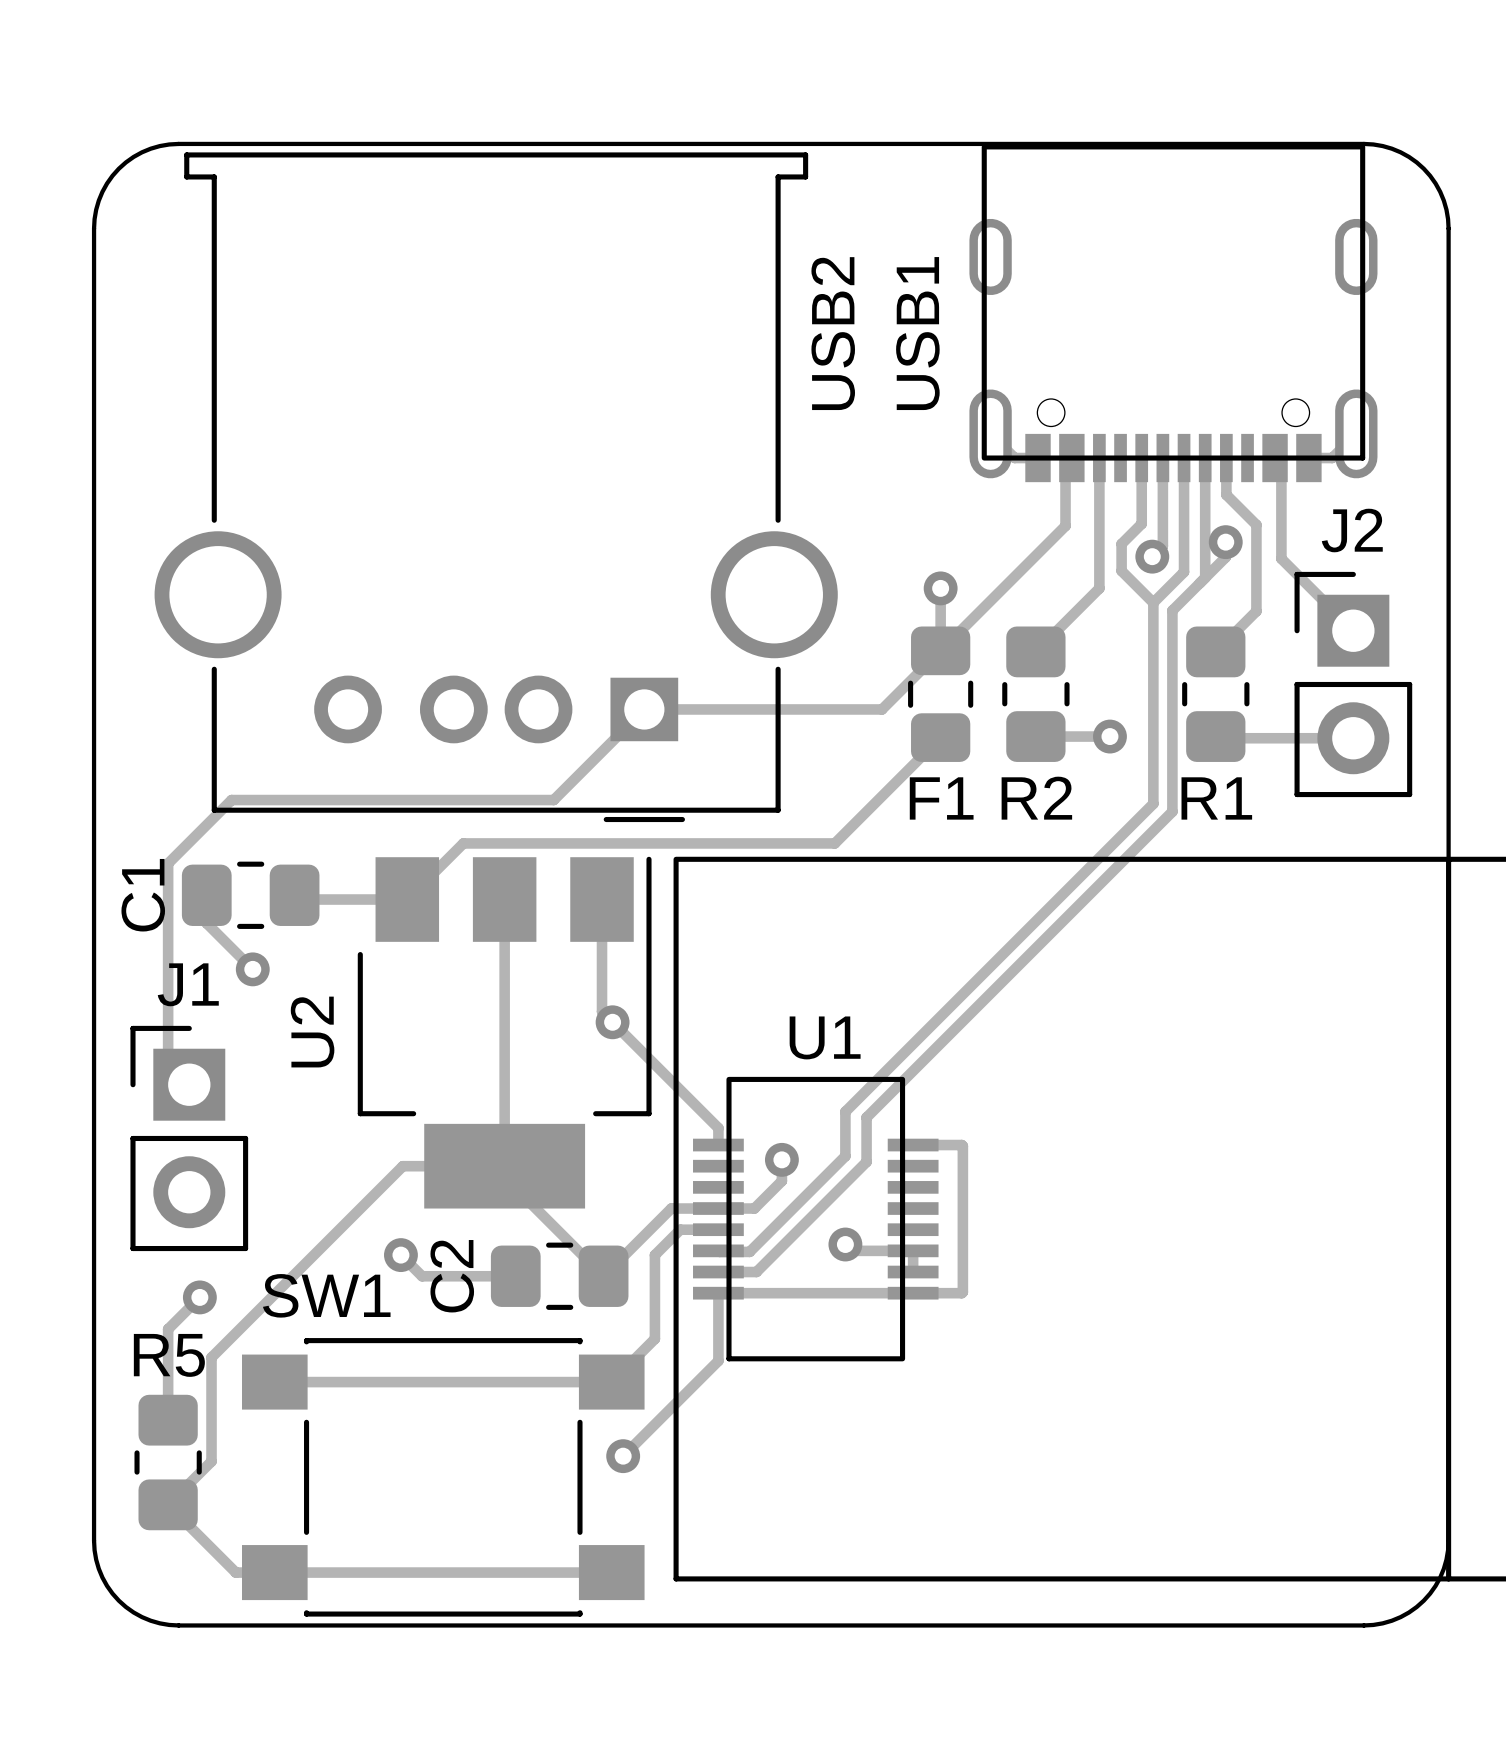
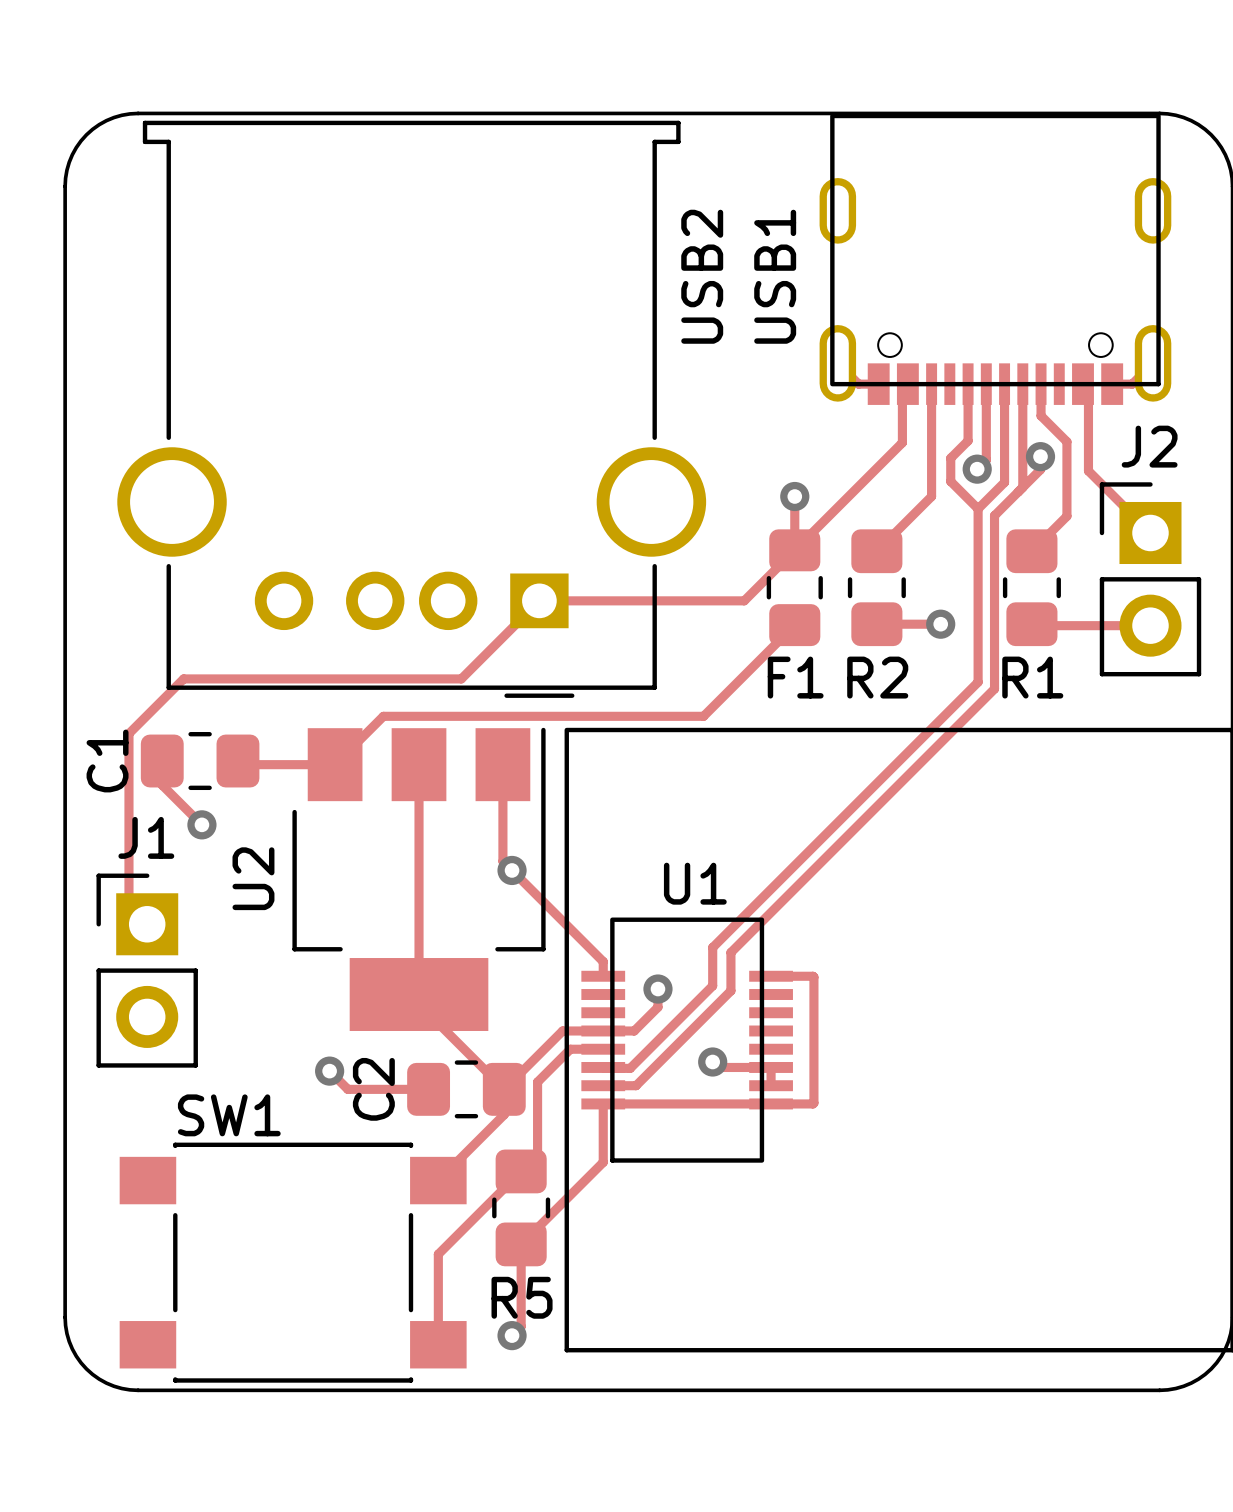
track: (504, 1166) (402, 1166) (211, 1357) (211, 1461) (168, 1504) (235, 1572) (611, 1572) -> none
track: (654, 1255) (654, 1338) (611, 1382) (274, 1382) -> (548, 1071) (537, 1082) (537, 1155) (438, 1254) (438, 1344)
track: none -> (504, 1089) (504, 1114) (438, 1180)
SW1 name position: SW1 (326, 1295) -> SW1 (229, 1115)
track: (199, 1297) (168, 1329) (168, 1420) -> none
via: (199, 1297) -> none
R5 name position: R5 (169, 1355) -> R5 (522, 1297)
track: none -> (521, 1244) (521, 1326) (512, 1335)
via position: (623, 1456) -> (512, 1335)
R5 position: (168, 1462) -> (521, 1207)
SW1 position: (443, 1477) -> (293, 1262)

